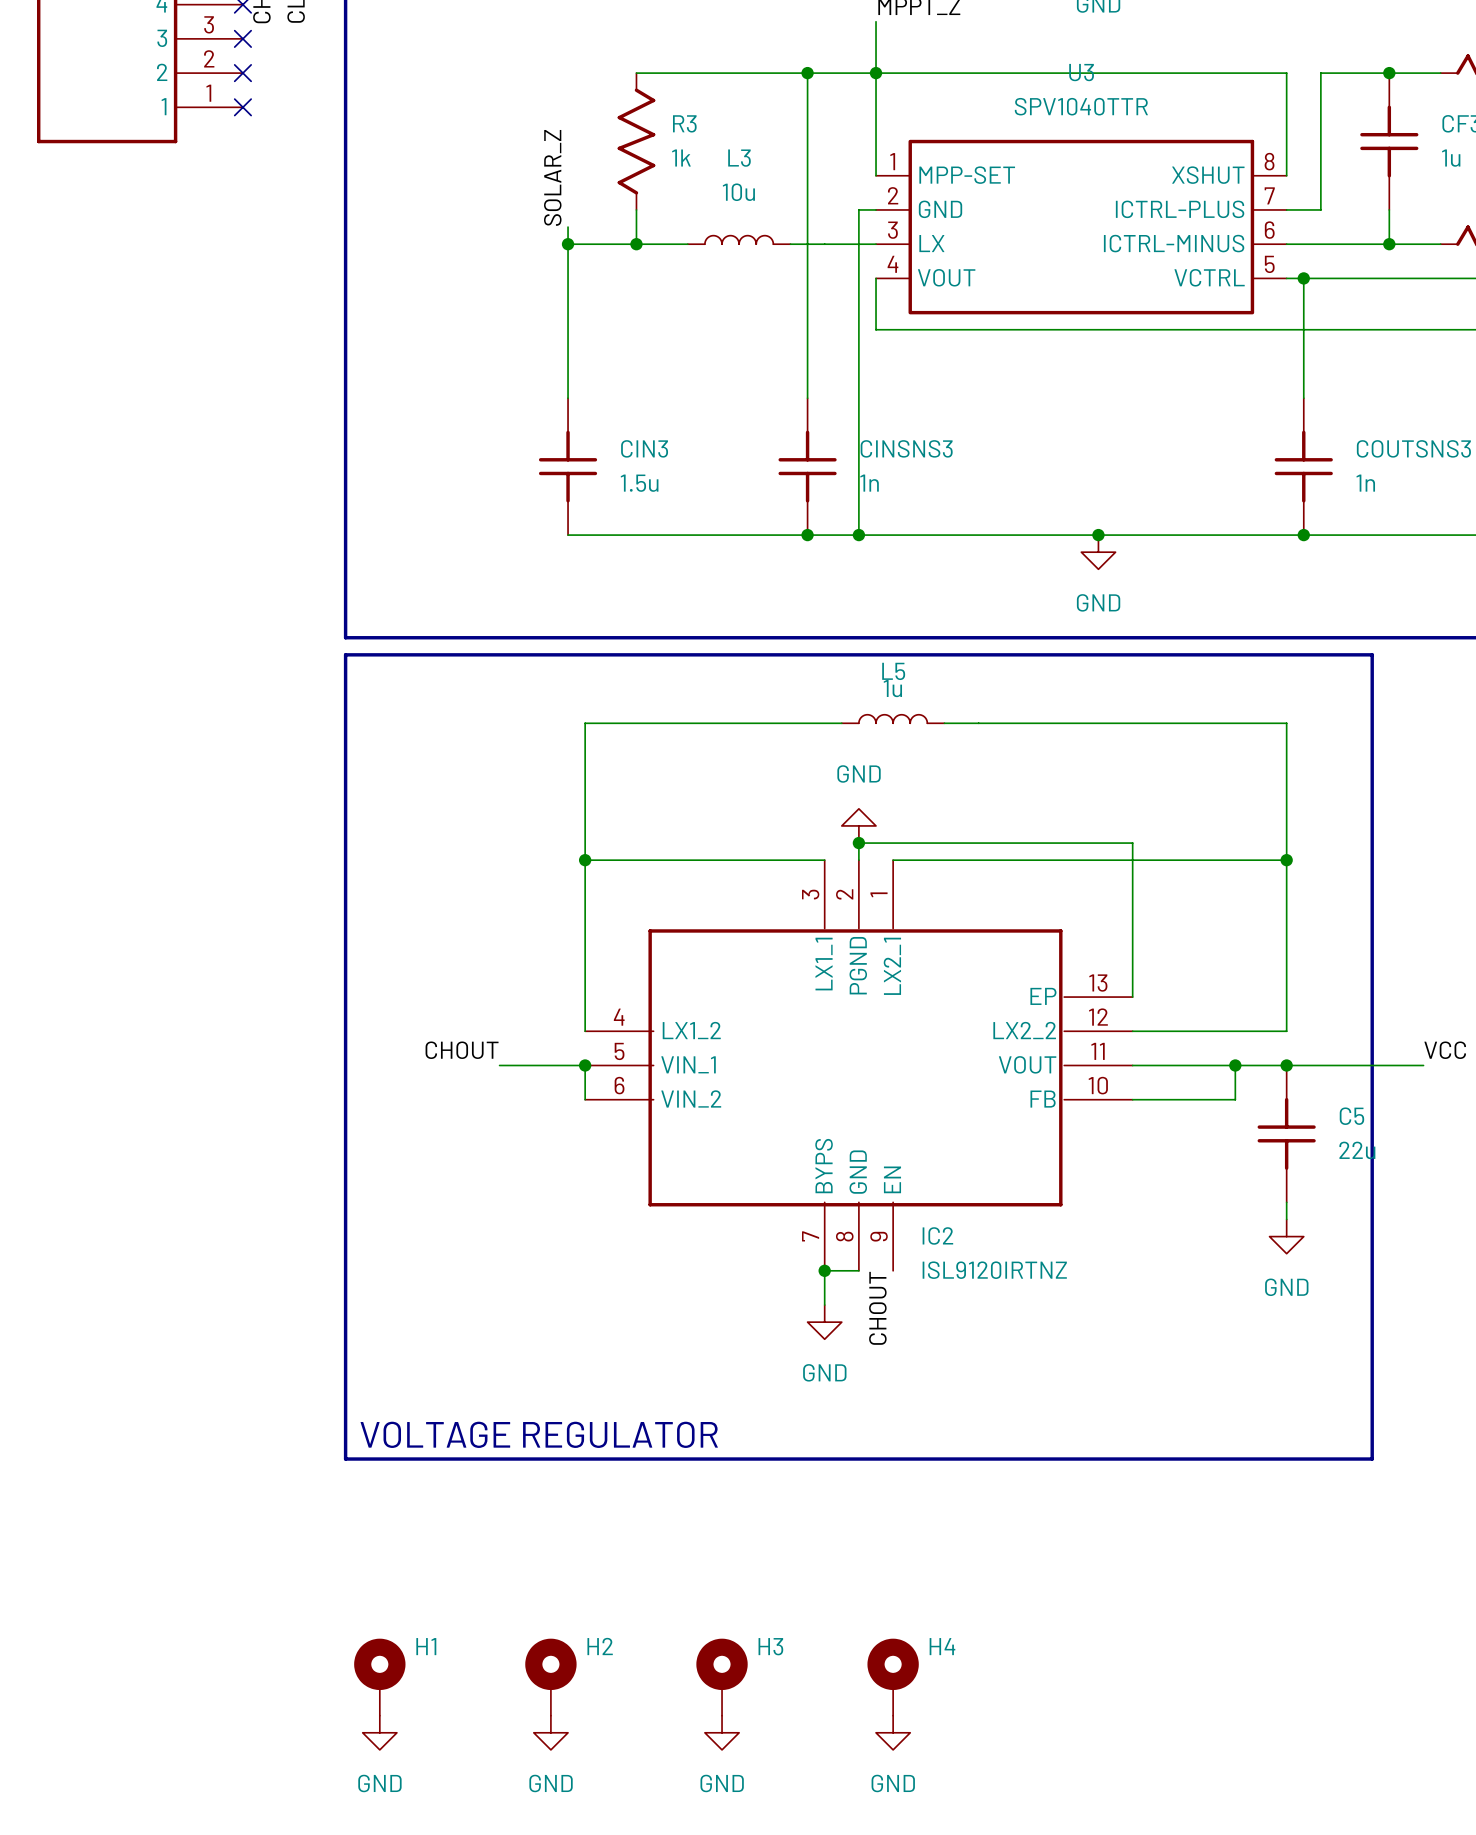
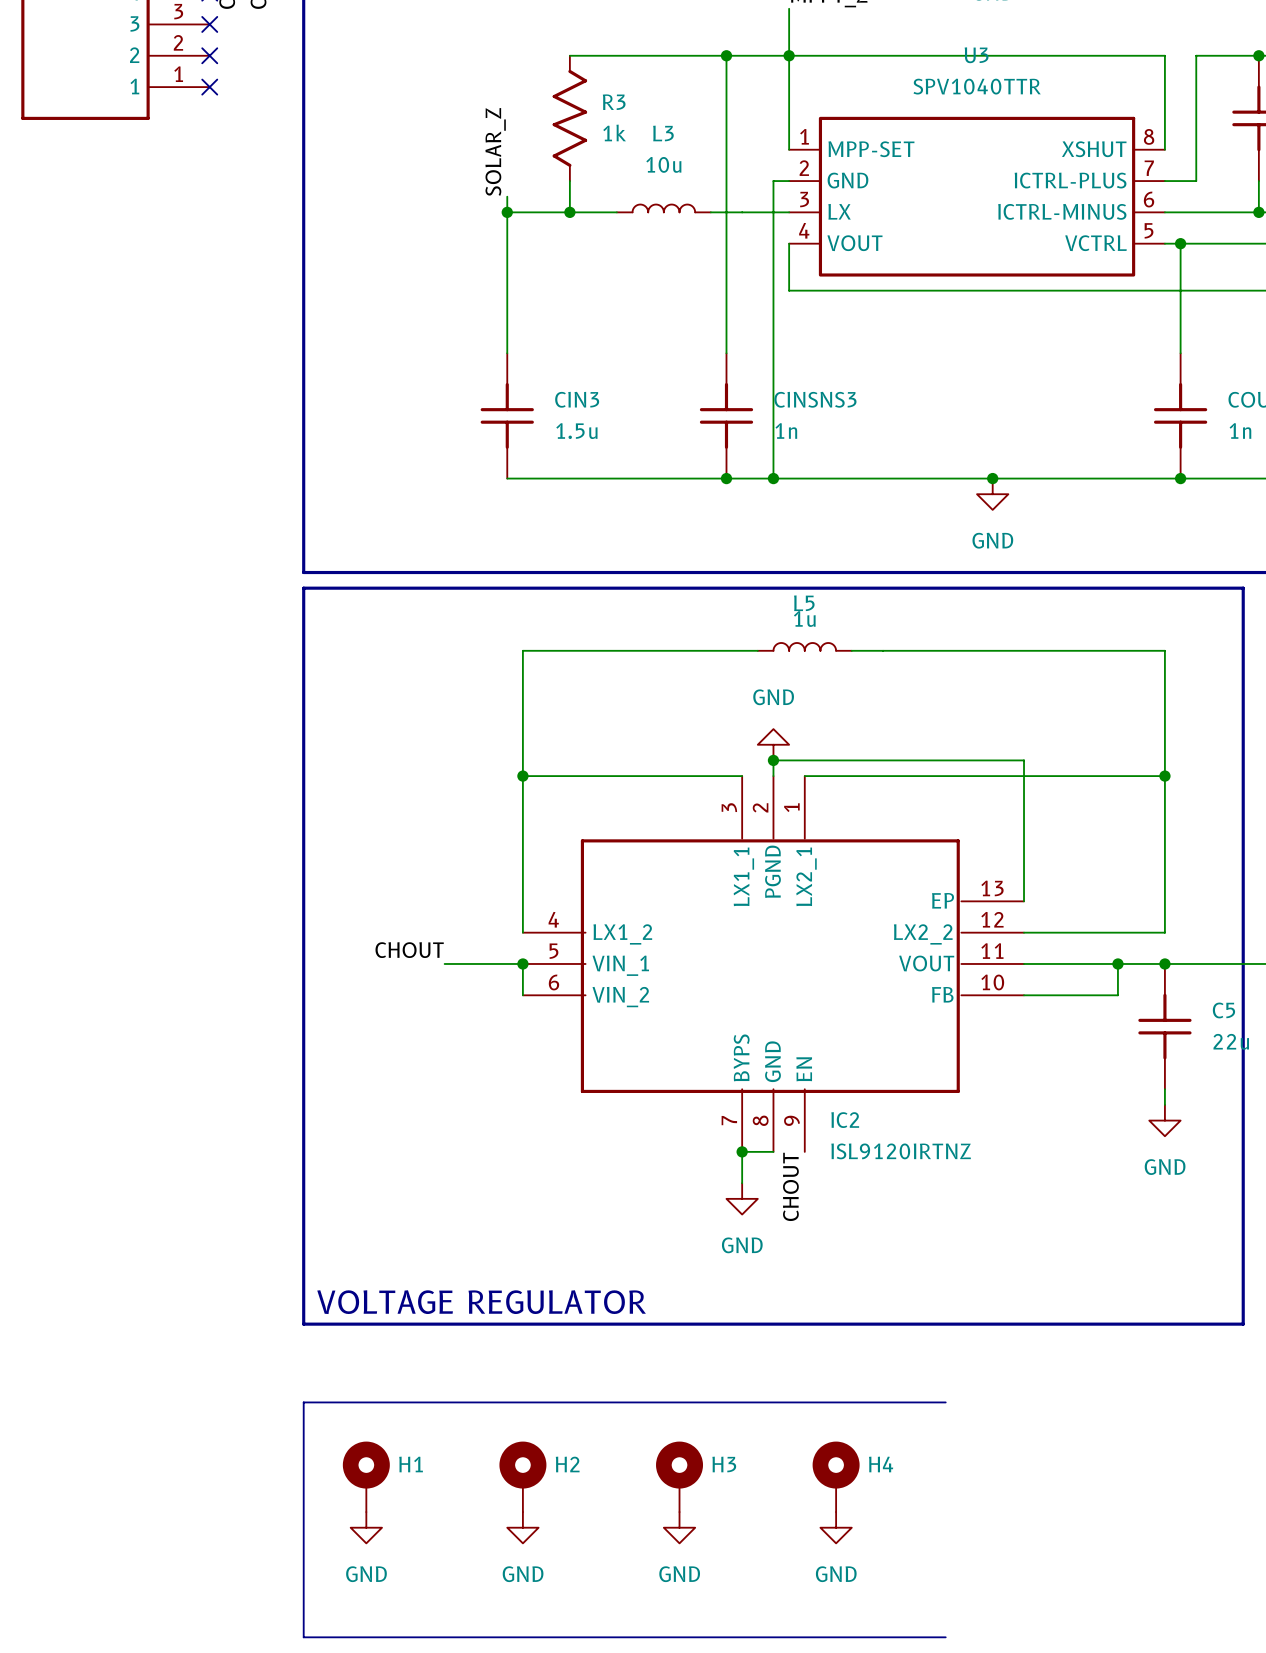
line: none -> (945, 1402) (303, 1402) (303, 1637) (945, 1637)
H1 name position: H1 (426, 1646) -> H1 (411, 1464)
H2 name position: H2 (600, 1646) -> H2 (567, 1464)
H3 name position: H3 (770, 1646) -> H3 (724, 1464)
H4 name position: H4 (942, 1646) -> H4 (881, 1464)
H1 position: (379, 1677) -> (366, 1476)
H2 position: (550, 1677) -> (522, 1476)
H3 position: (722, 1677) -> (679, 1476)
H4 position: (893, 1677) -> (836, 1476)
power symbol position: GND (379, 1732) -> GND (366, 1527)
power symbol position: GND (550, 1732) -> GND (522, 1527)
power symbol position: GND (722, 1732) -> GND (679, 1527)
power symbol position: GND (893, 1732) -> GND (836, 1527)

